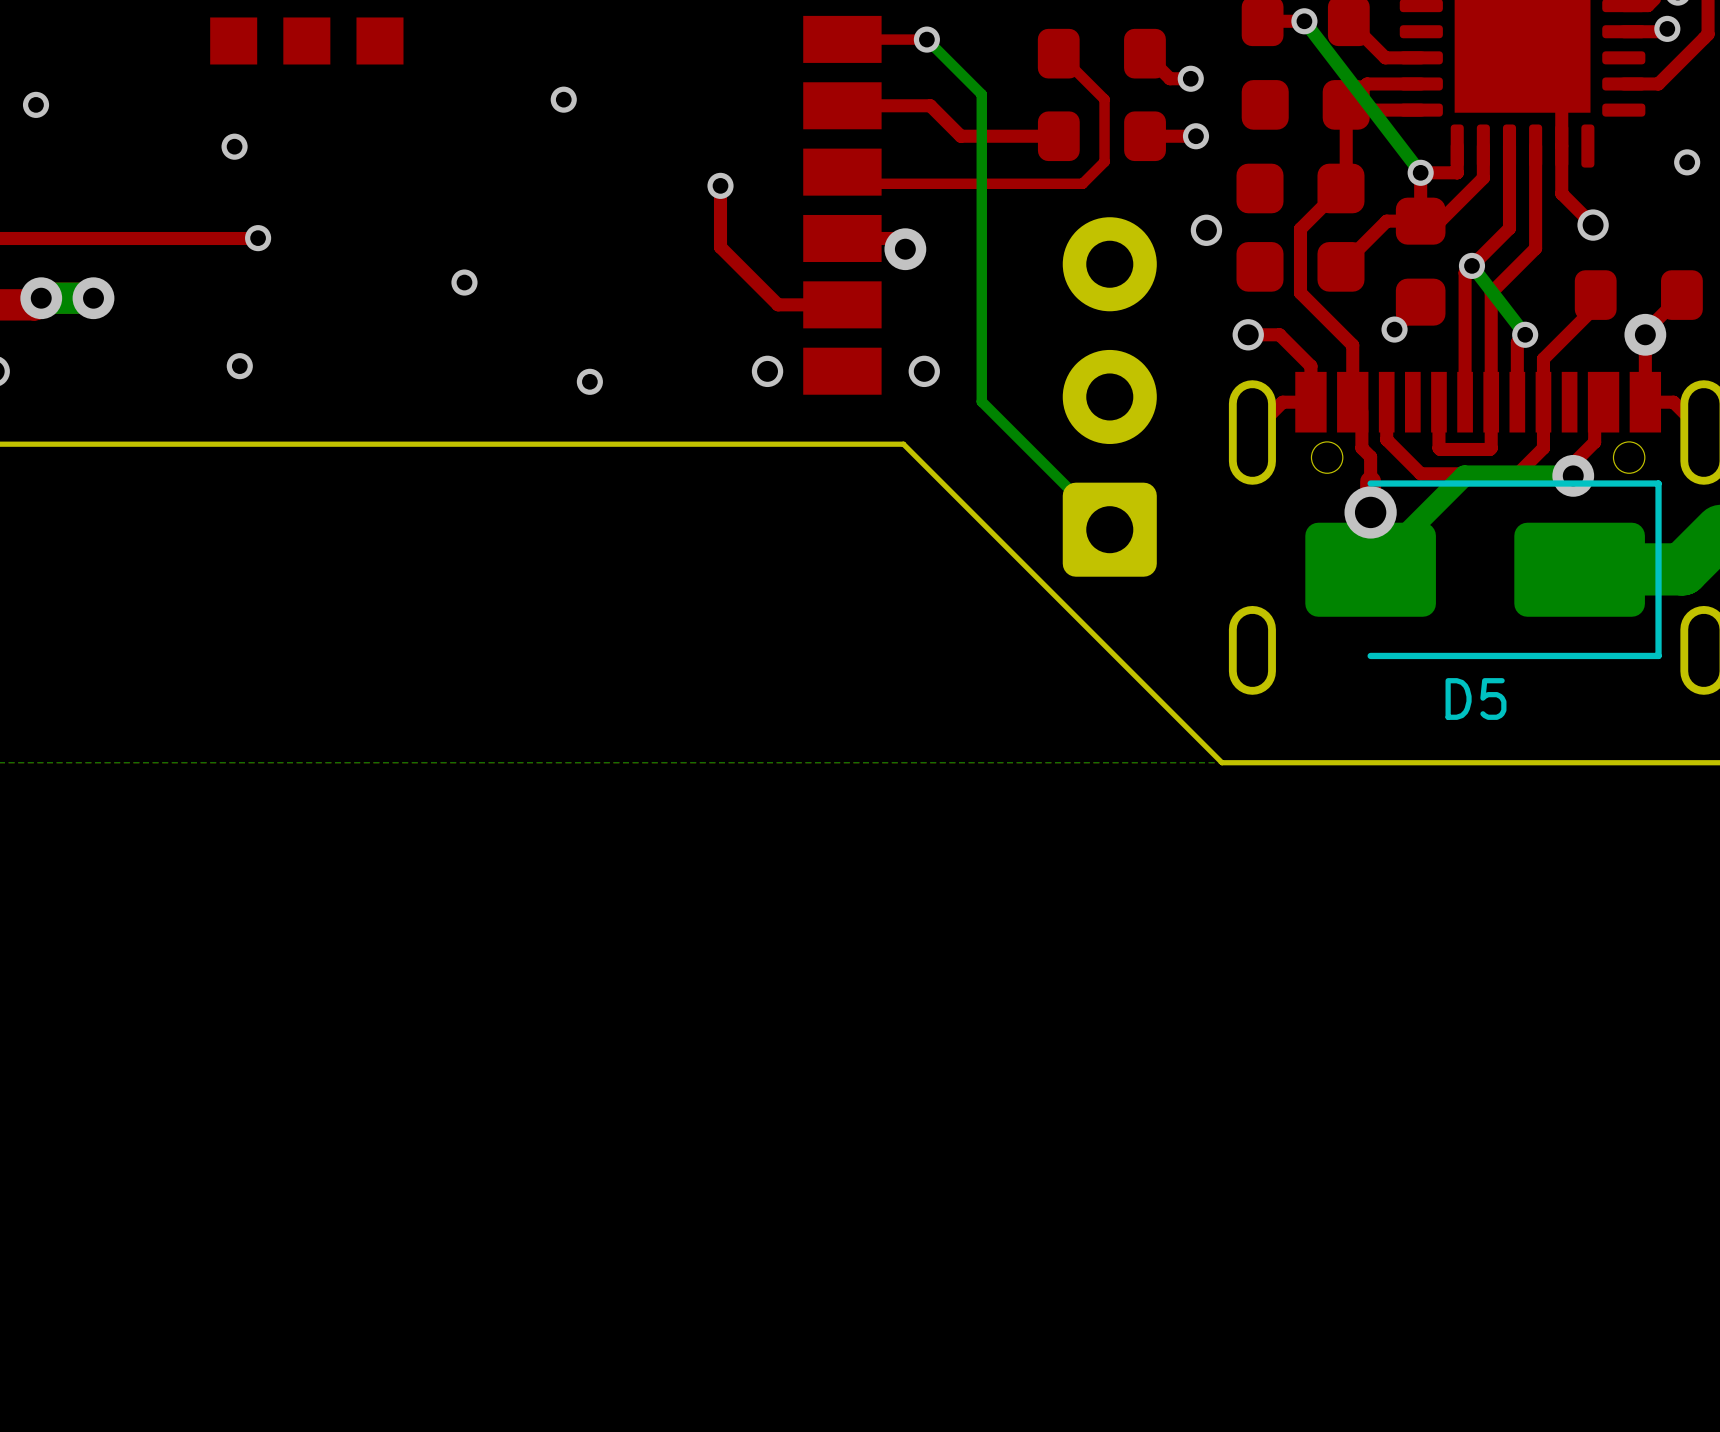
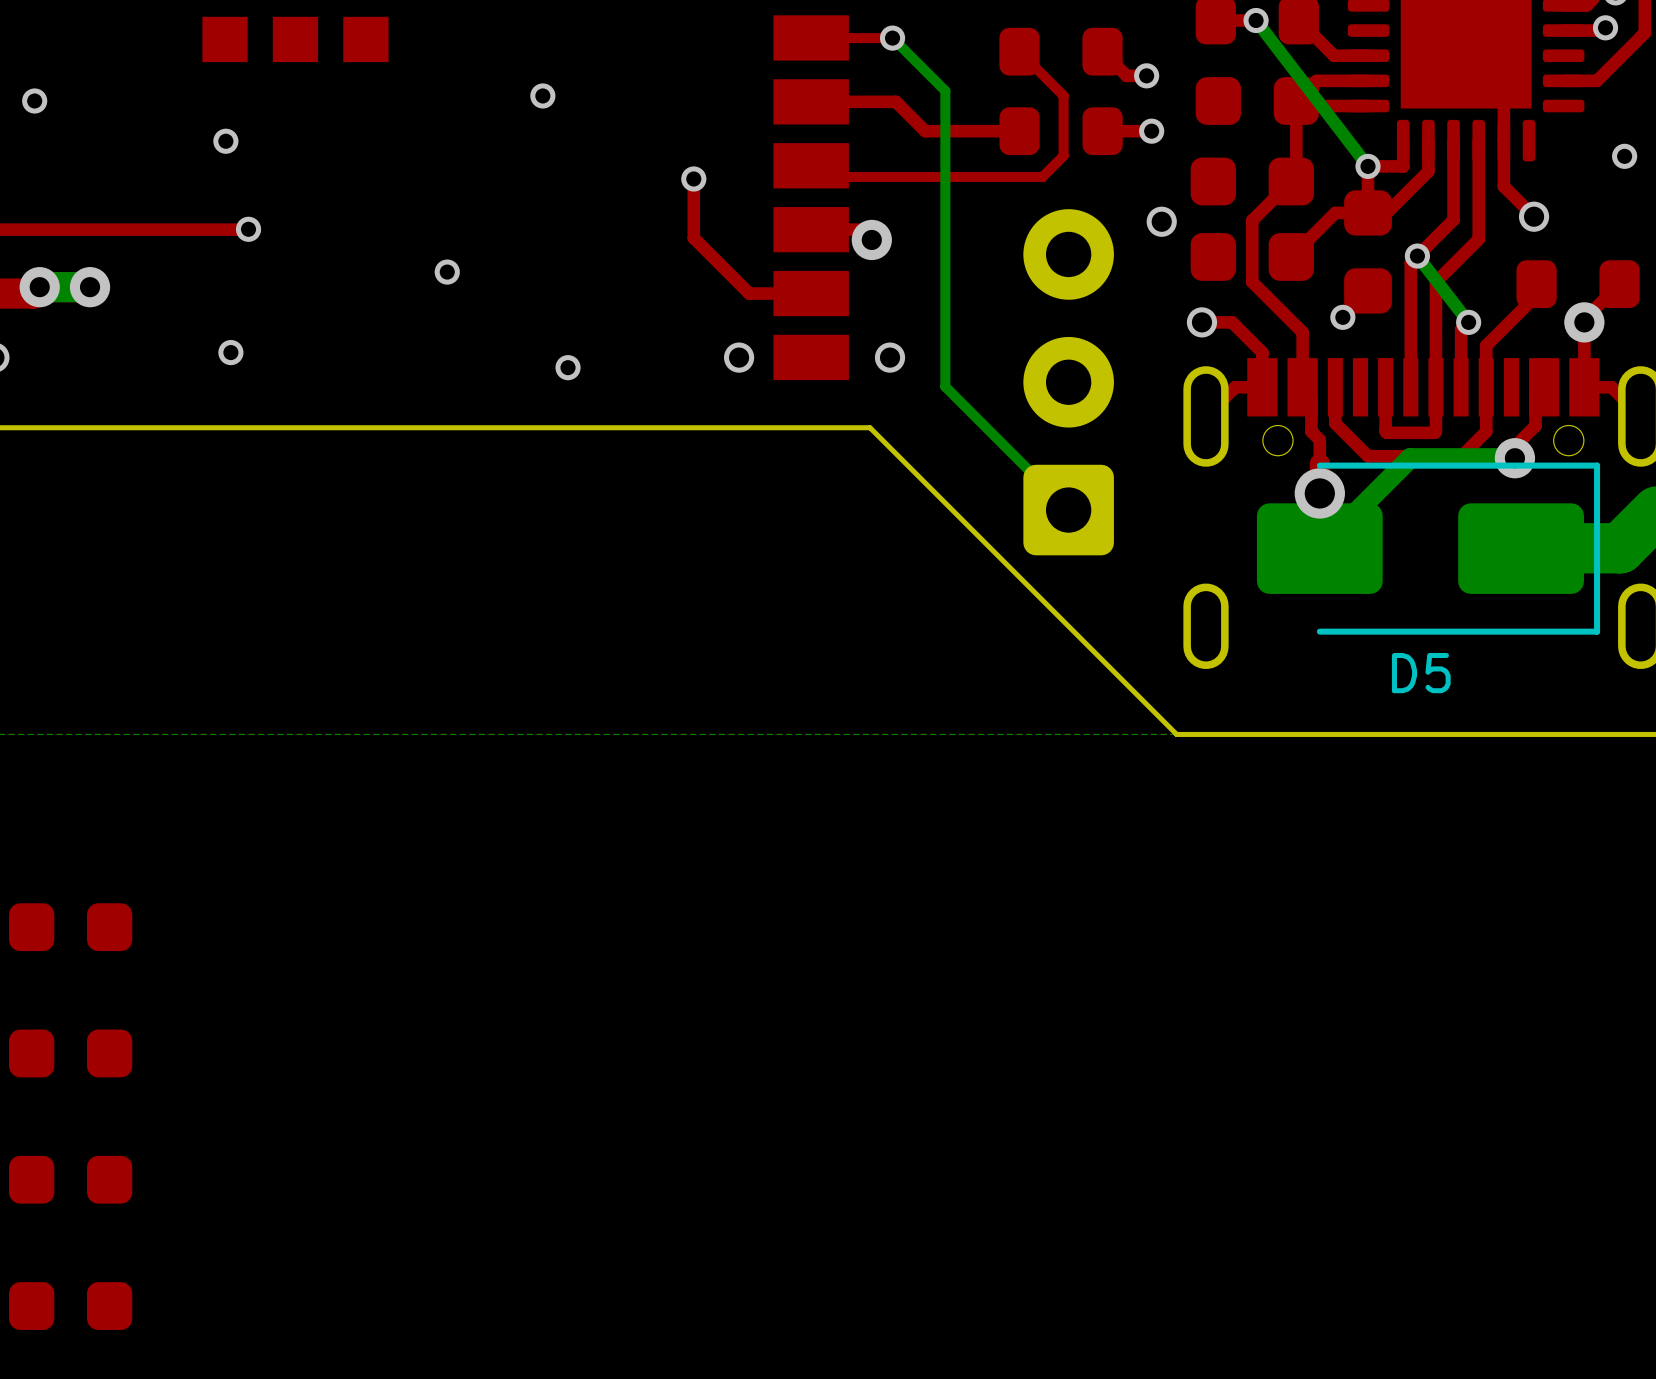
part: none -> (70, 927)
part: none -> (70, 1053)
part: none -> (70, 1179)
part: none -> (70, 1306)

